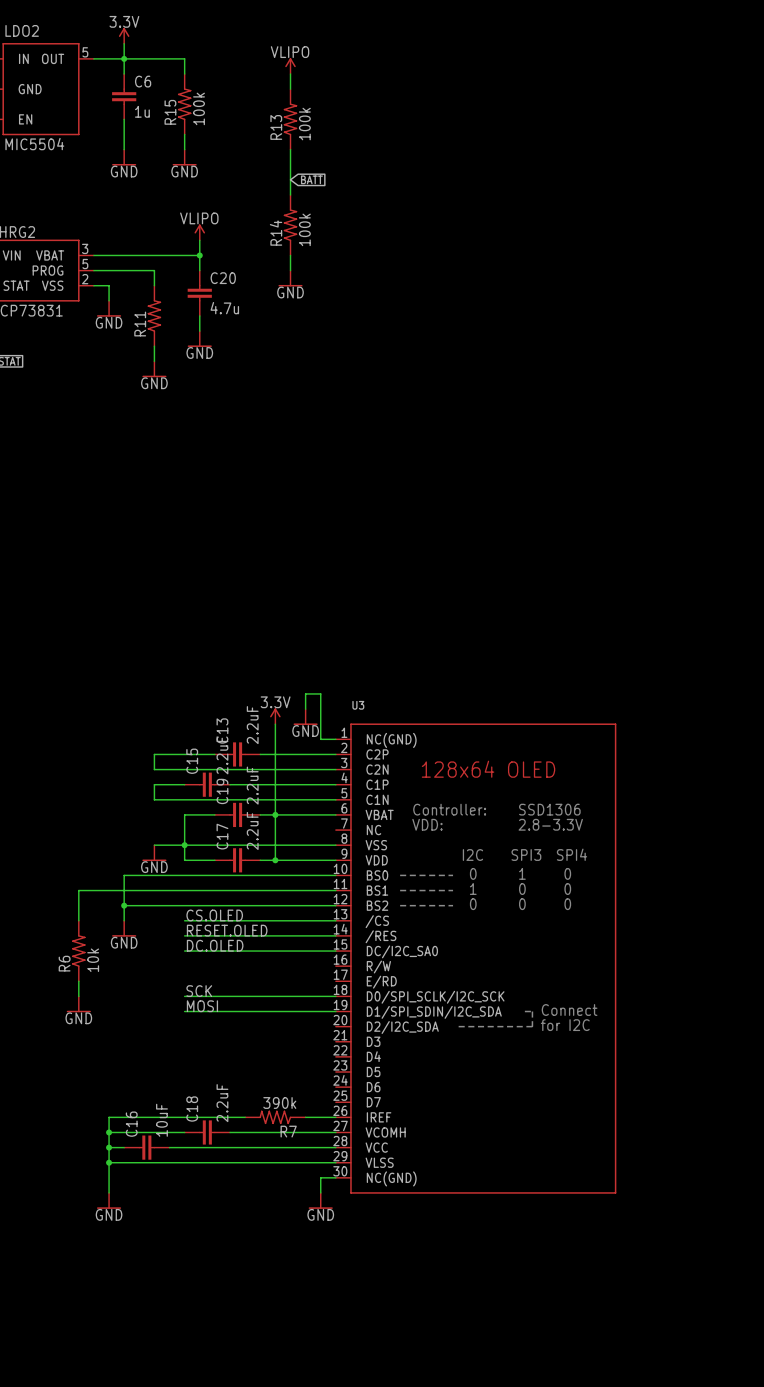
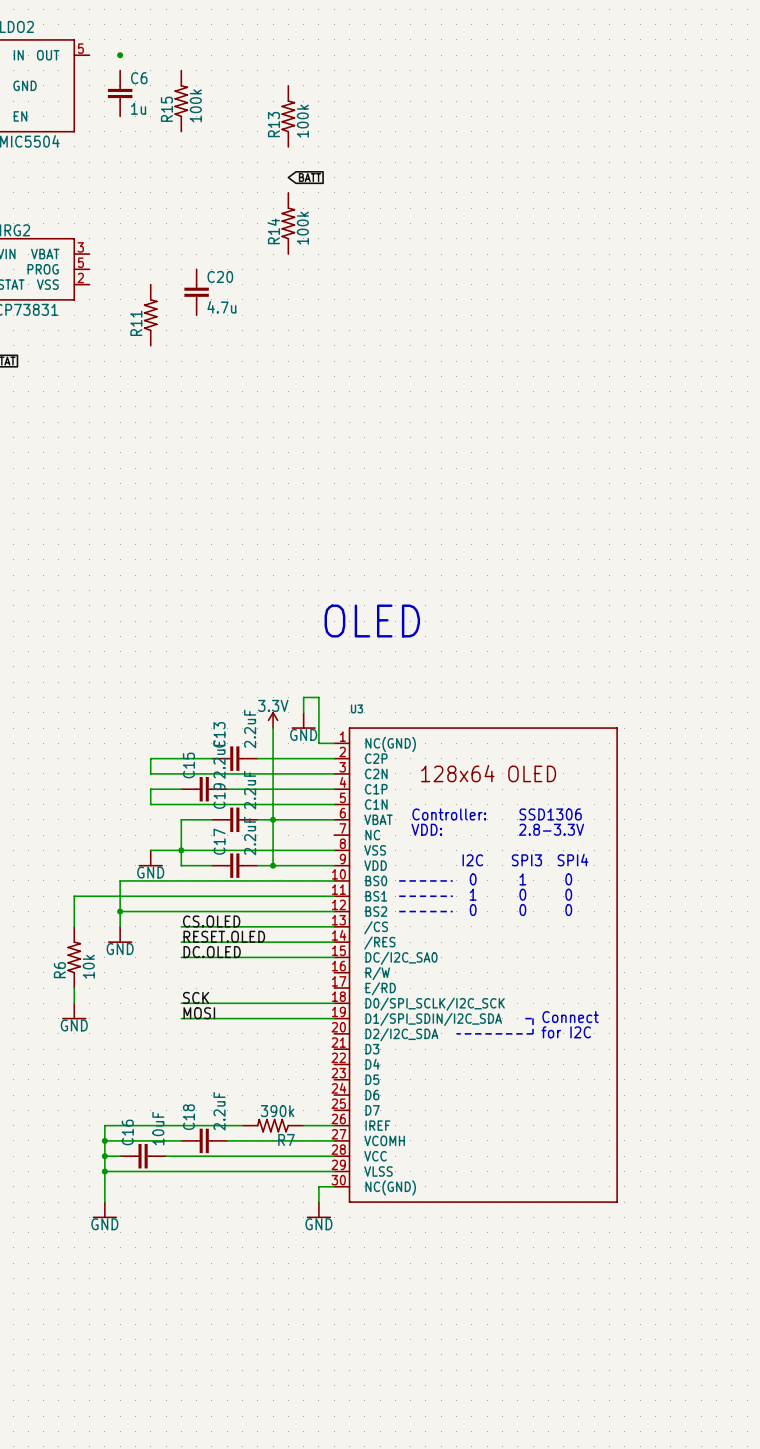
power symbol: 3.3V (124, 35) -> none
wire: (124, 43) (124, 74) -> none
wire: (93, 58) (184, 58) (184, 74) -> none
power symbol: VLIPO (290, 66) -> none
wire: (290, 74) (290, 89) -> none
wire: (124, 119) (124, 149) -> none
wire: (184, 134) (184, 149) -> none
wire: (290, 149) (290, 194) -> none
power symbol: GND (124, 157) -> none
power symbol: GND (184, 157) -> none
power symbol: VLIPO (199, 232) -> none
wire: (199, 240) (199, 270) -> none
wire: (93, 255) (199, 255) -> none
junction: (199, 255) -> none
wire: (290, 255) (290, 270) -> none
wire: (93, 270) (154, 270) (154, 285) -> none
power symbol: GND (290, 278) -> none
wire: (93, 285) (109, 285) (109, 300) -> none
power symbol: GND (109, 308) -> none
wire: (199, 315) (199, 331) -> none
power symbol: GND (199, 339) -> none
wire: (154, 346) (154, 361) -> none
power symbol: GND (154, 369) -> none
text: none -> OLED (372, 621)

